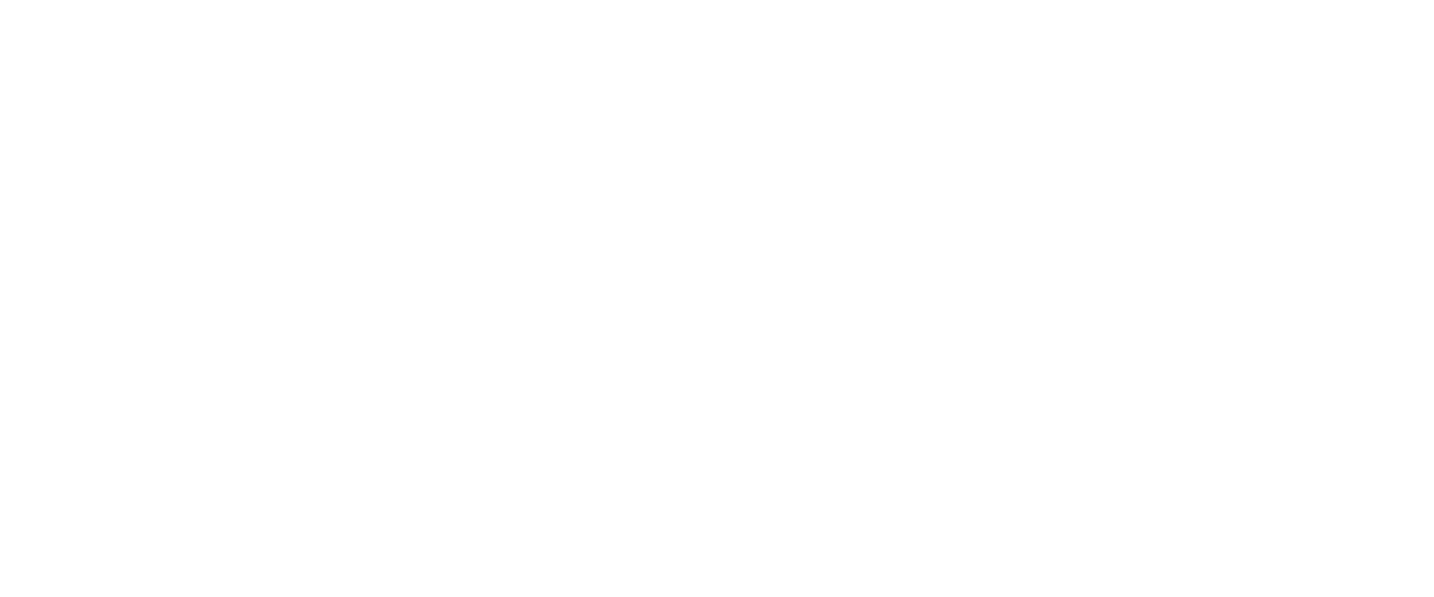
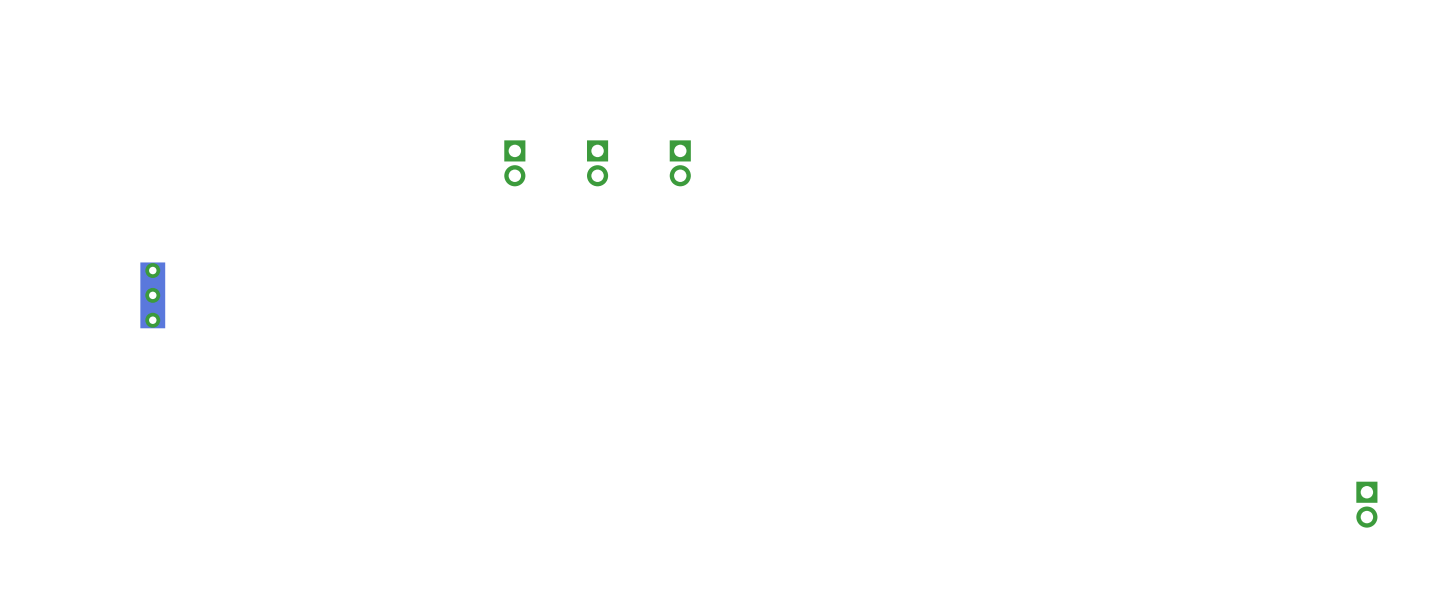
part: none -> (514, 163)
part: none -> (597, 163)
part: none -> (680, 163)
part: none -> (152, 295)
part: none -> (1366, 504)

